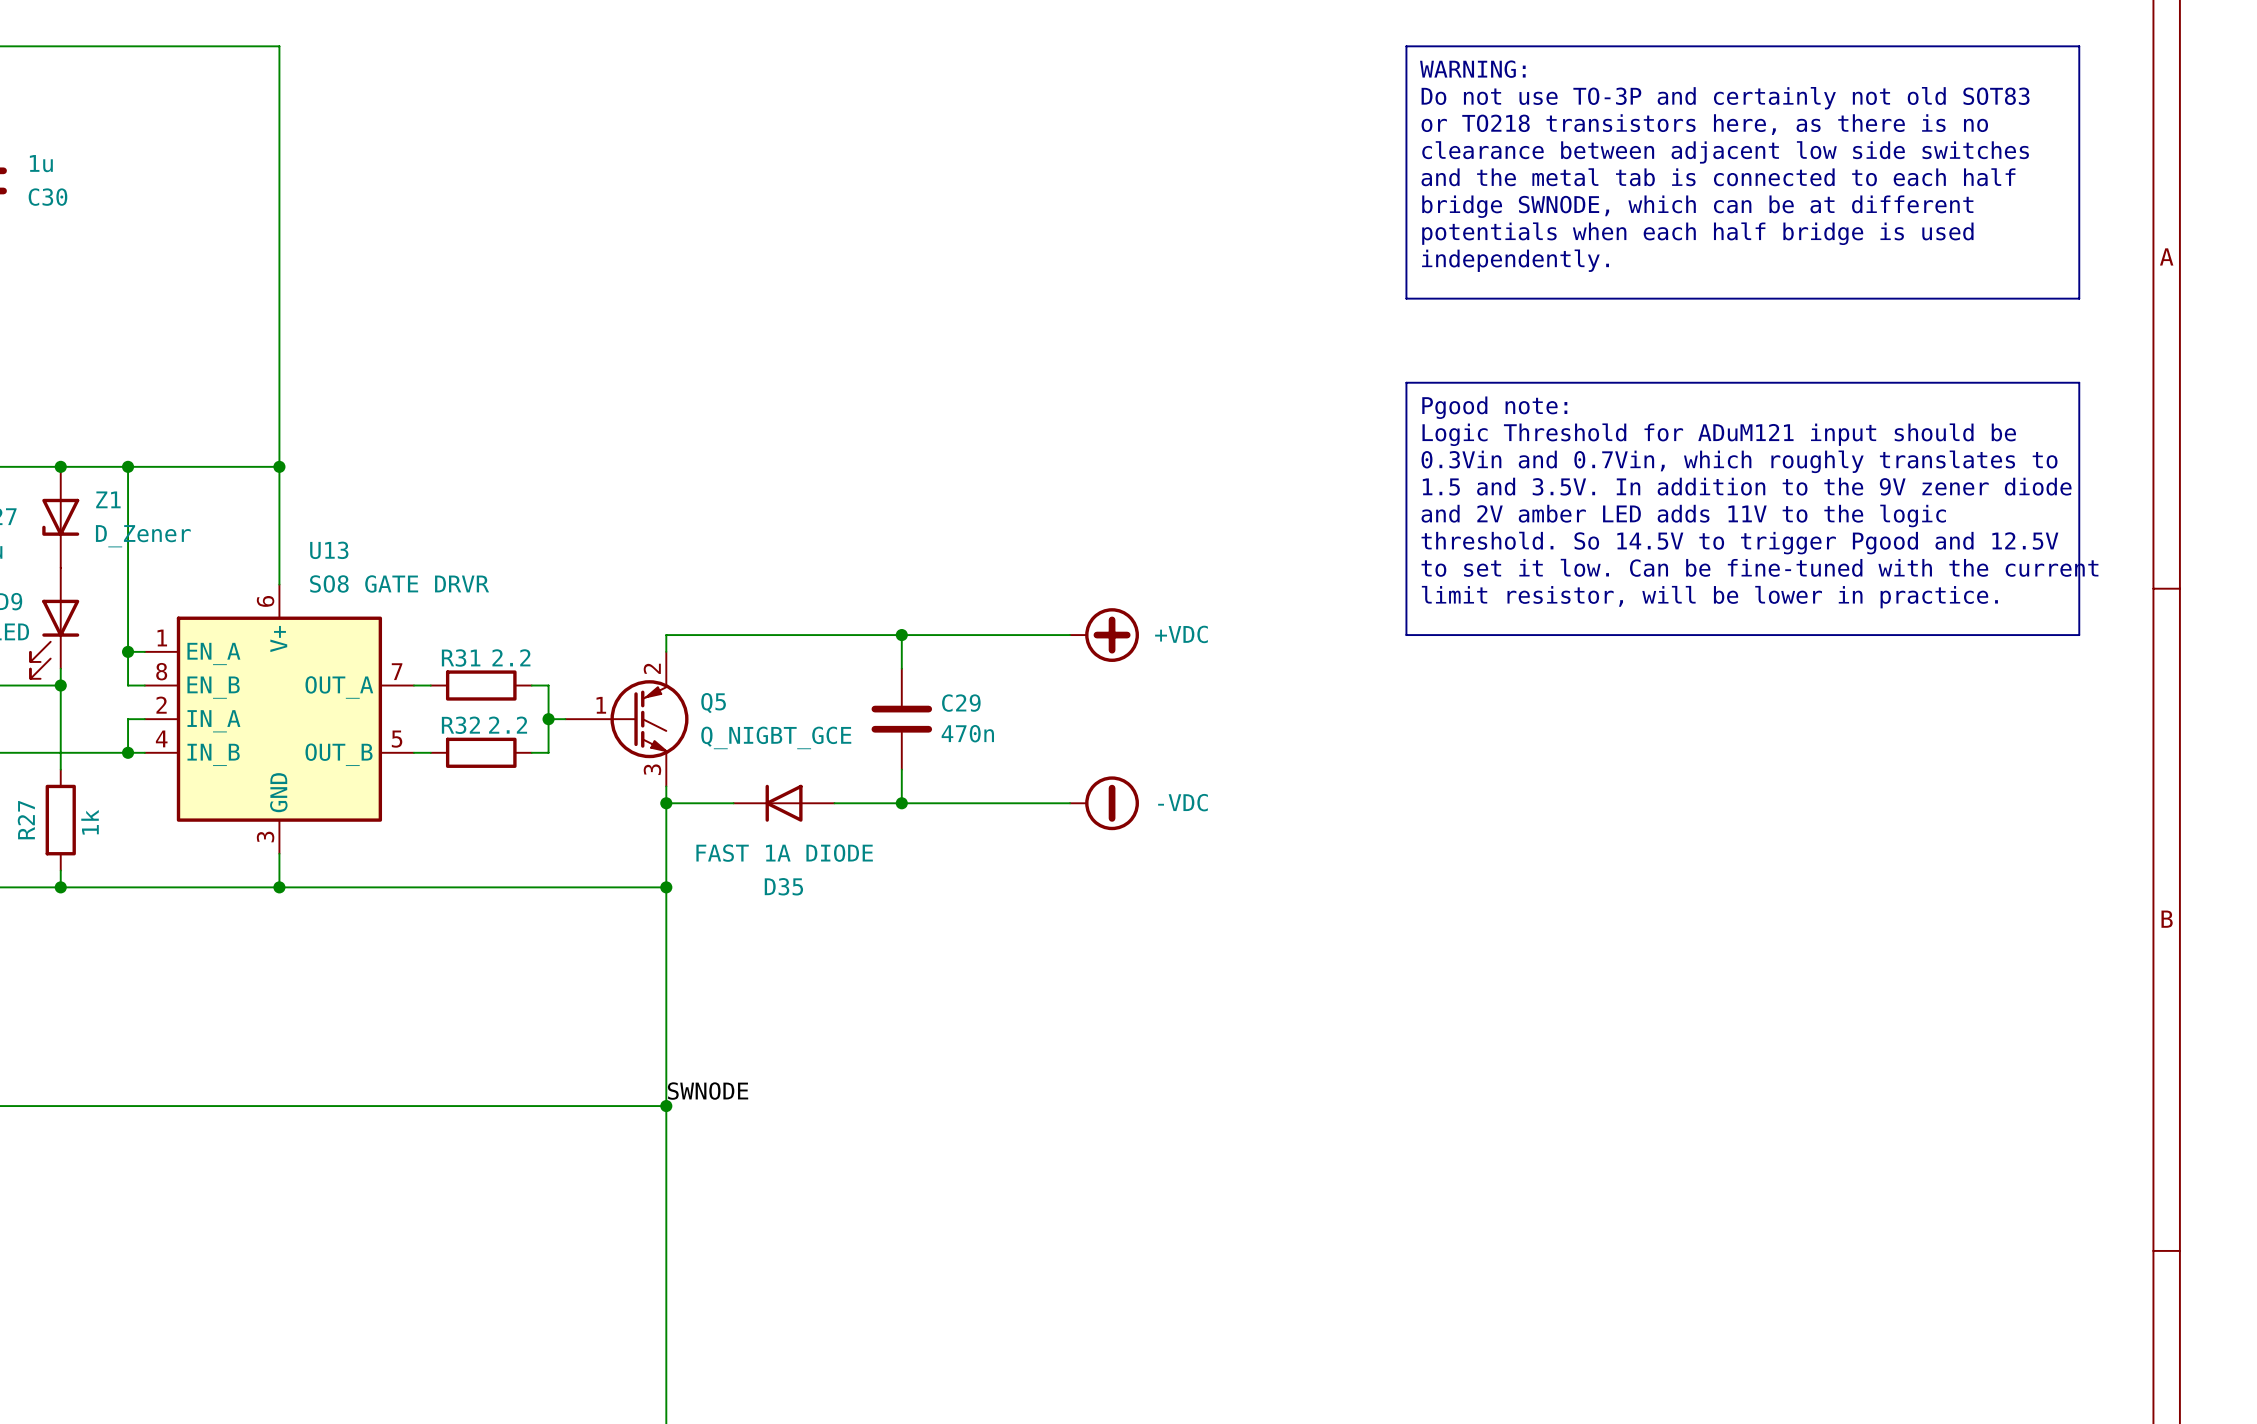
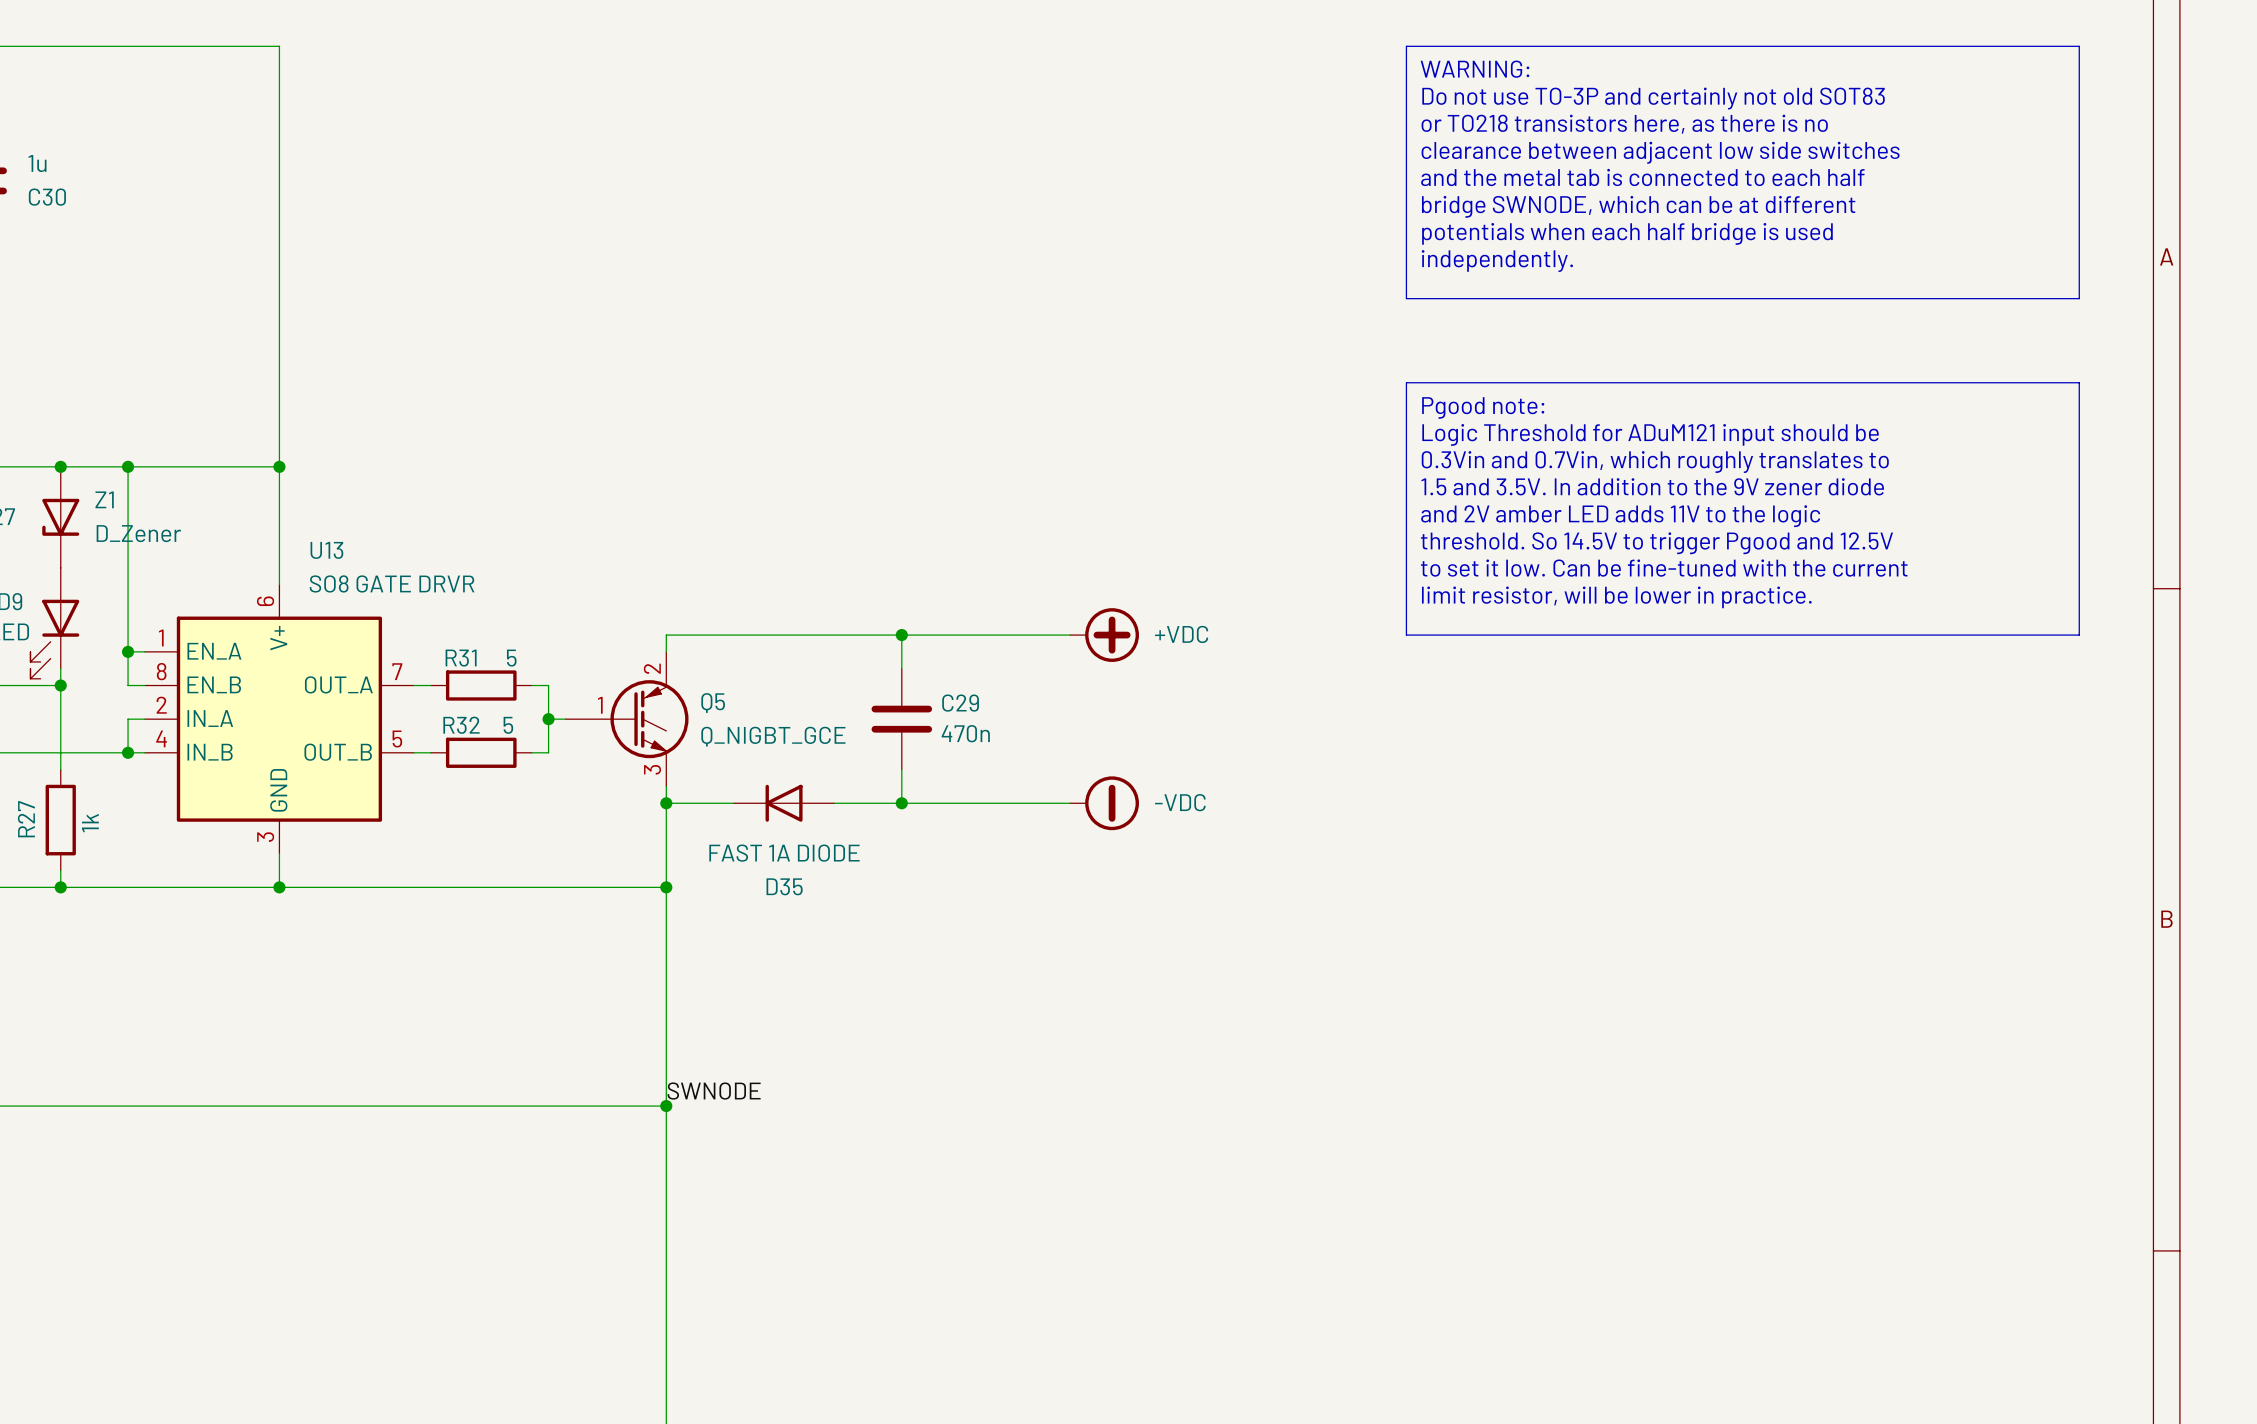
R31 value: 2.2 (511, 657) -> 5 (511, 658)
R32 value: 2.2 (508, 725) -> 5 (508, 725)

